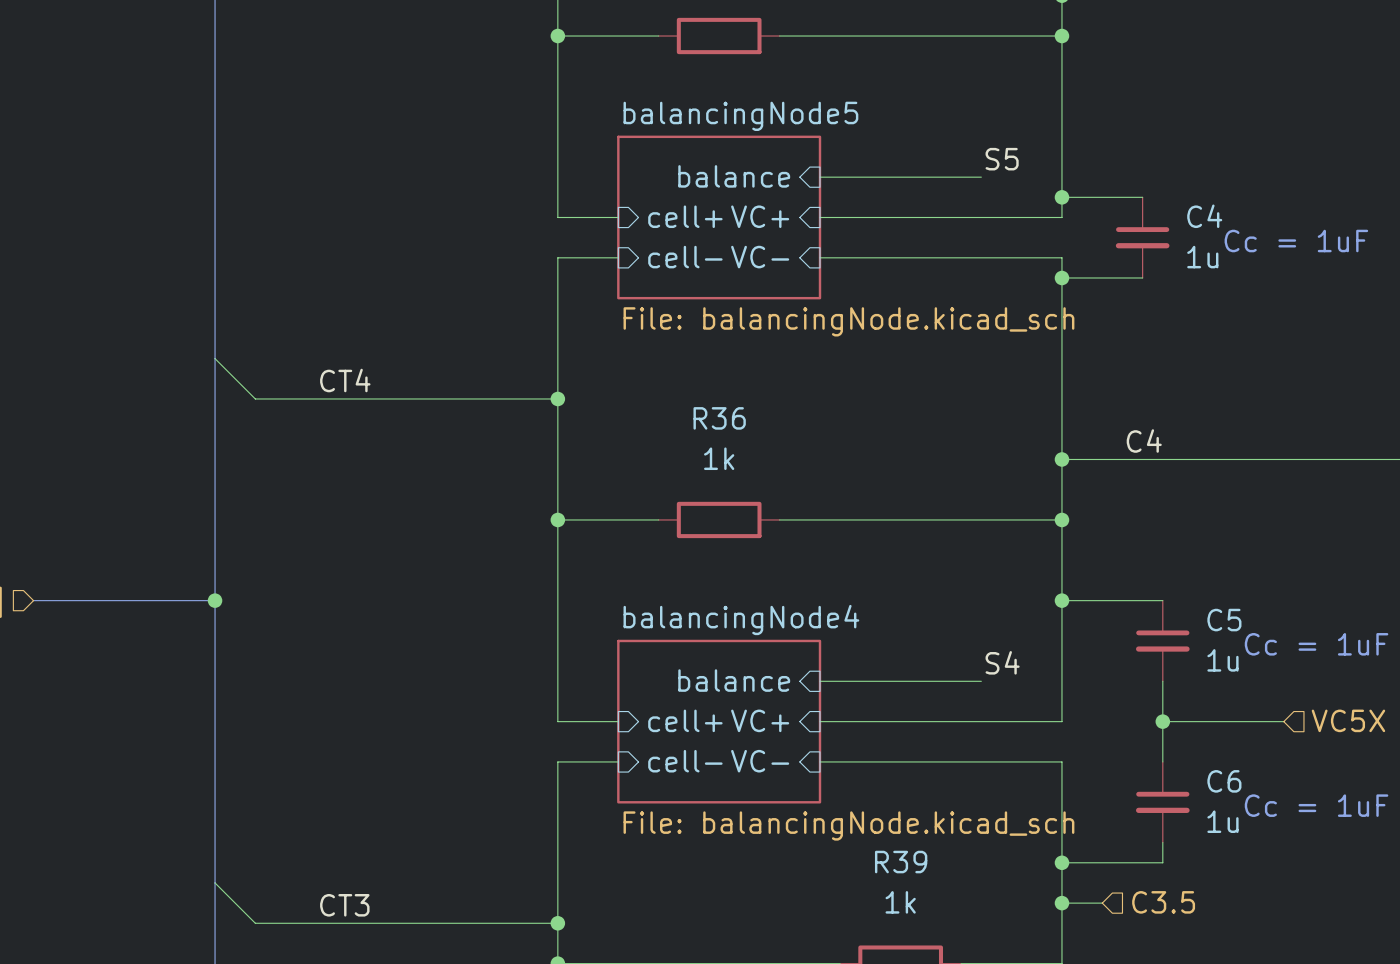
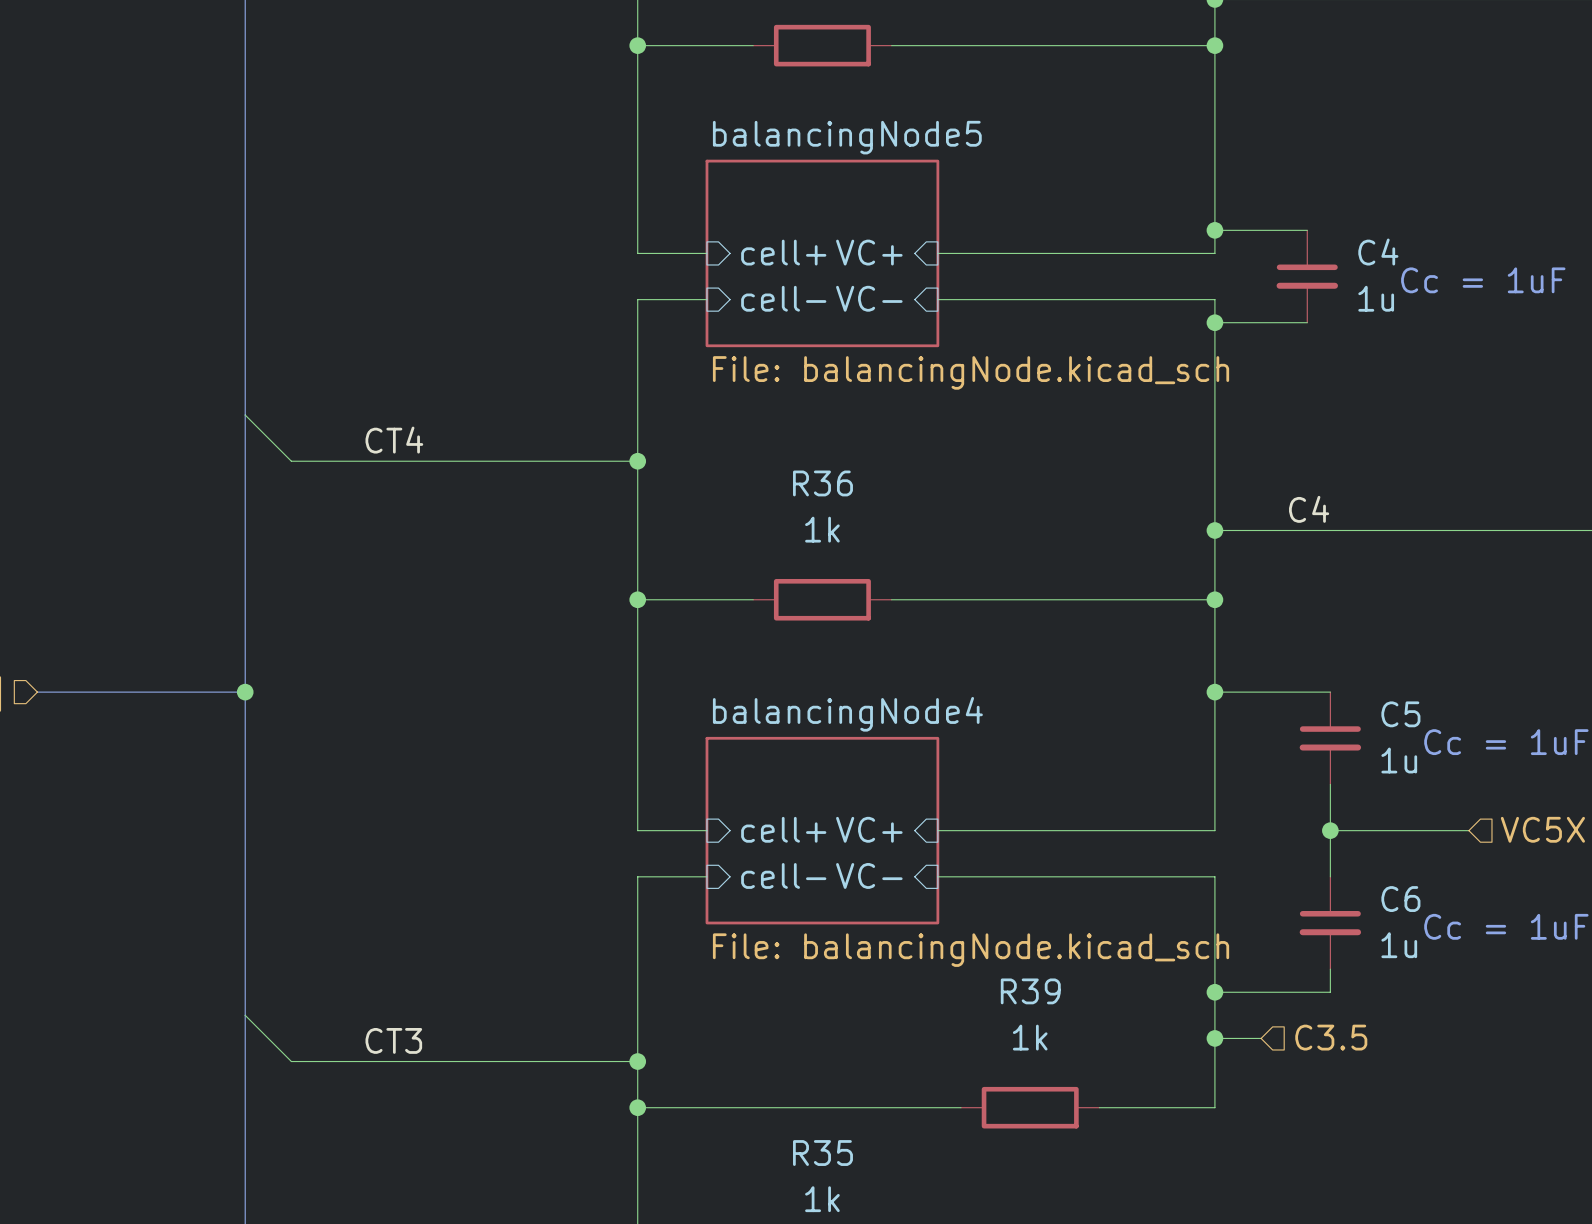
label: S5 (1002, 159) -> none
sheet pin: balance (734, 176) -> none
wire: (819, 177) (981, 177) -> none
label: S4 (1002, 662) -> none
sheet pin: balance (734, 680) -> none
wire: (819, 681) (981, 681) -> none

